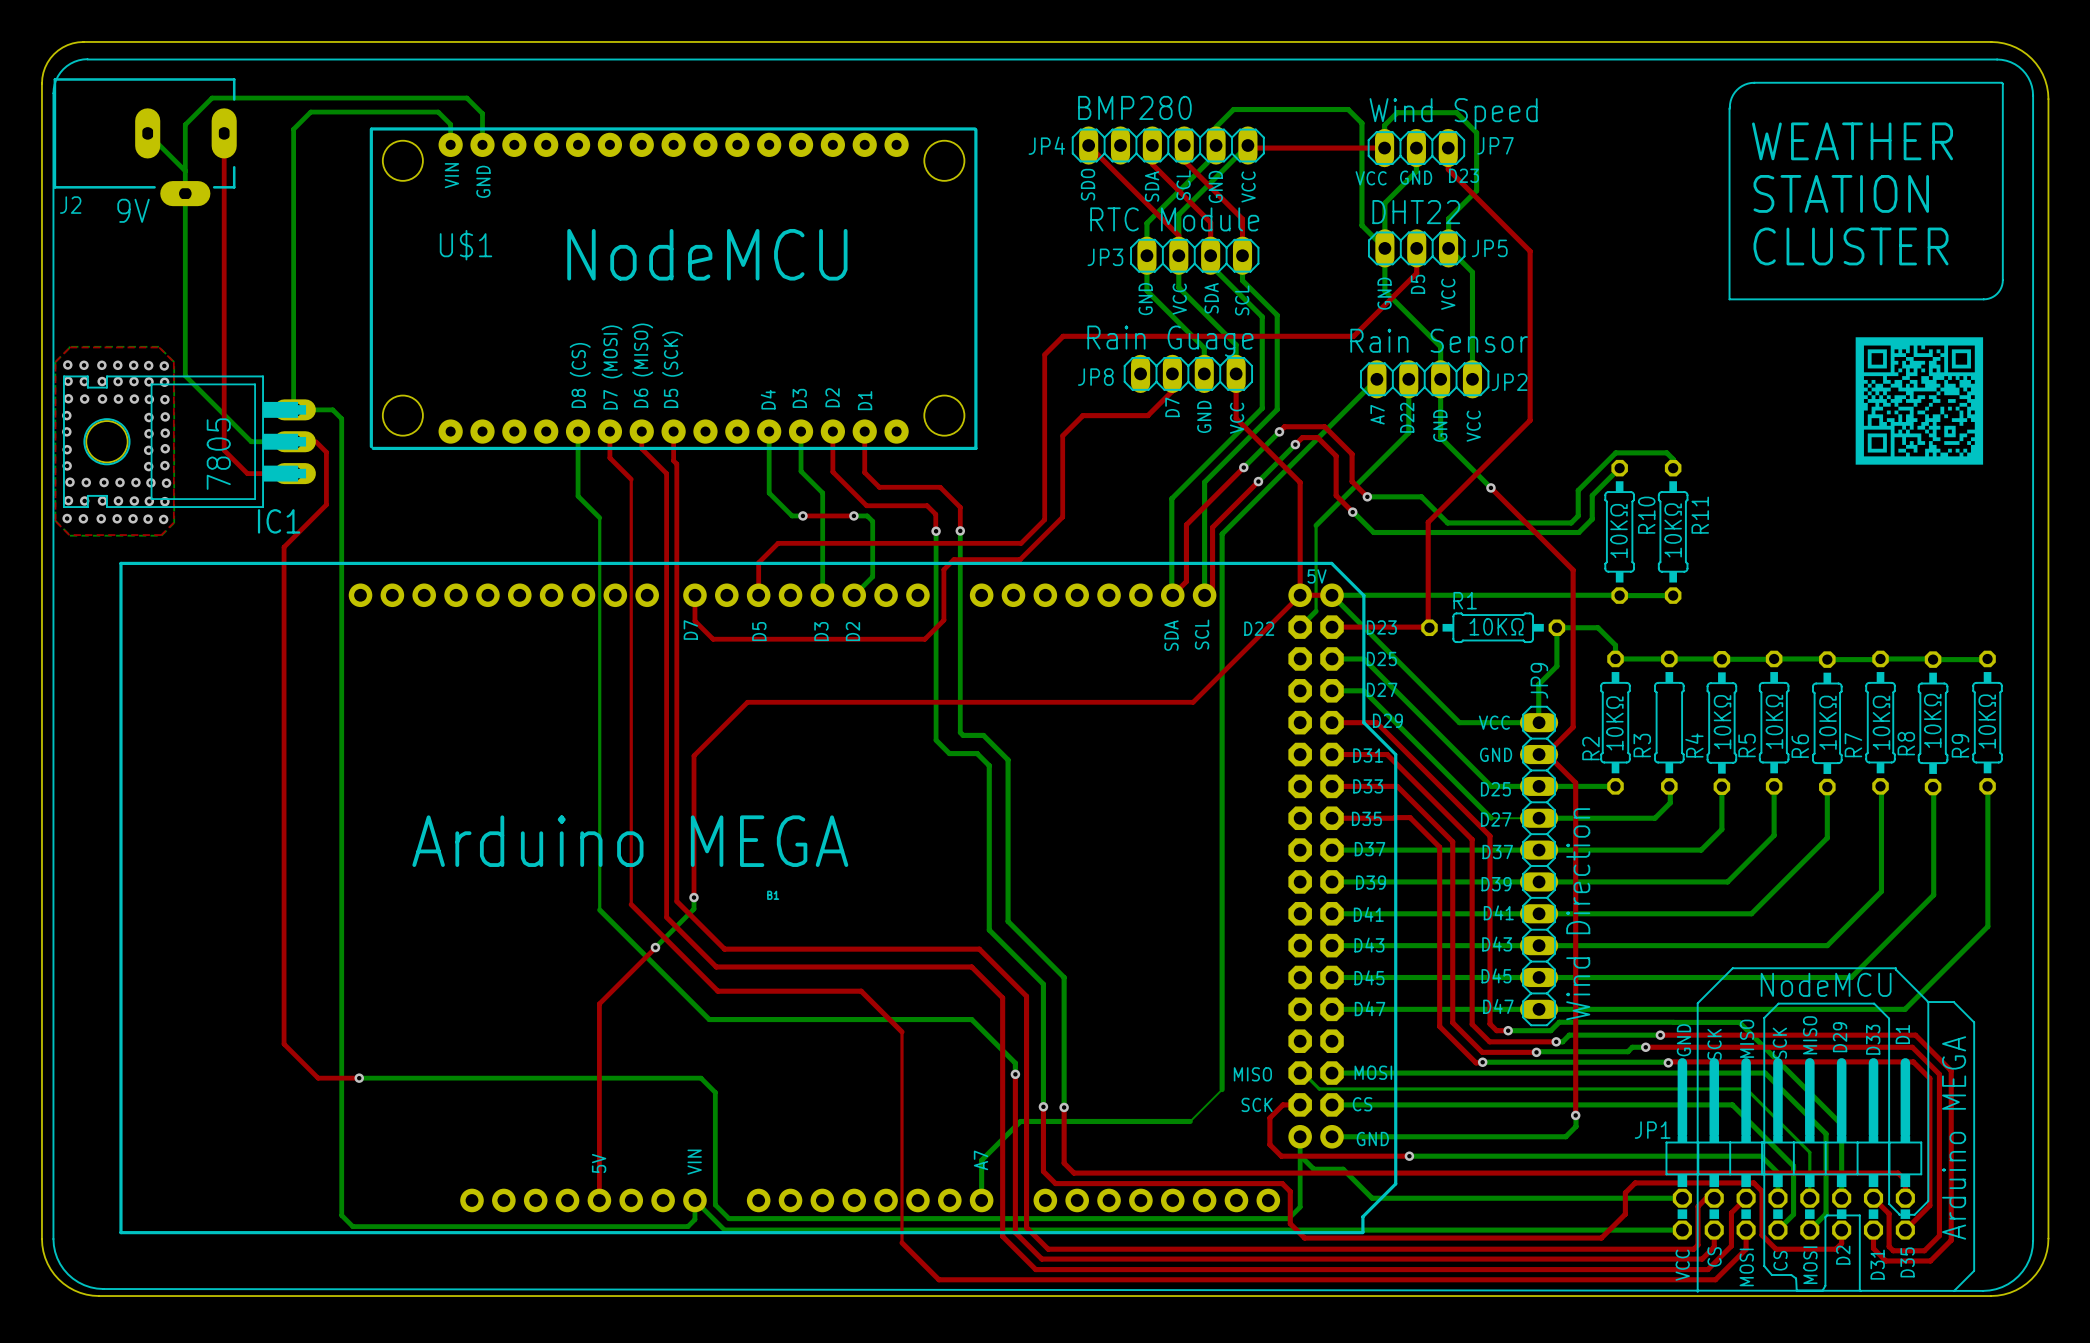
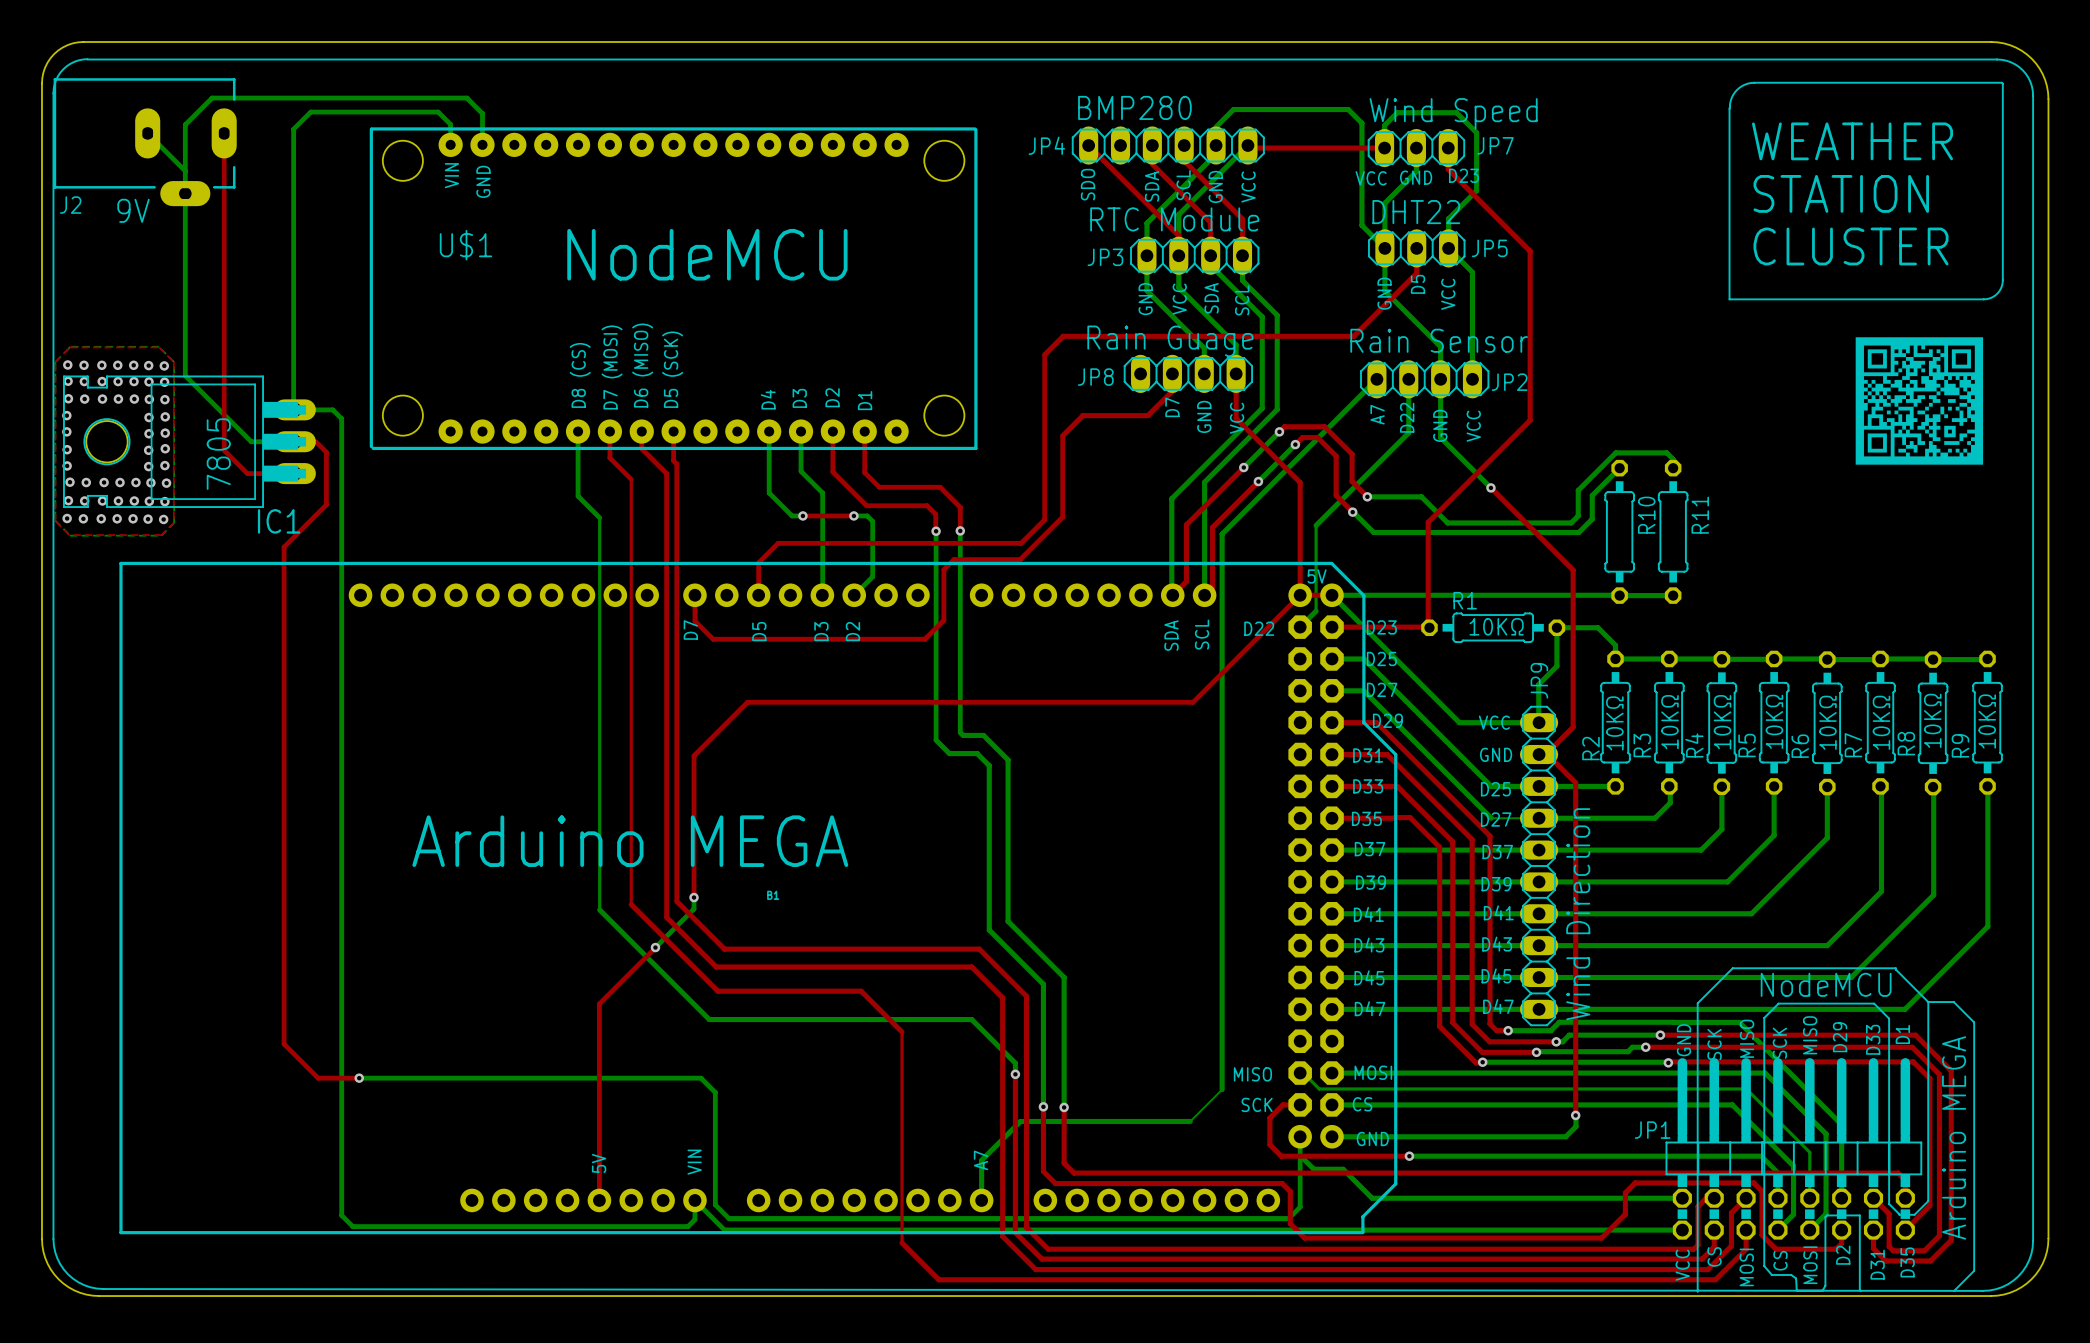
text: 10KΩ (1673, 530) -> none
text: 10KΩ (1619, 531) -> none
text: none -> 10KΩ (1669, 722)

